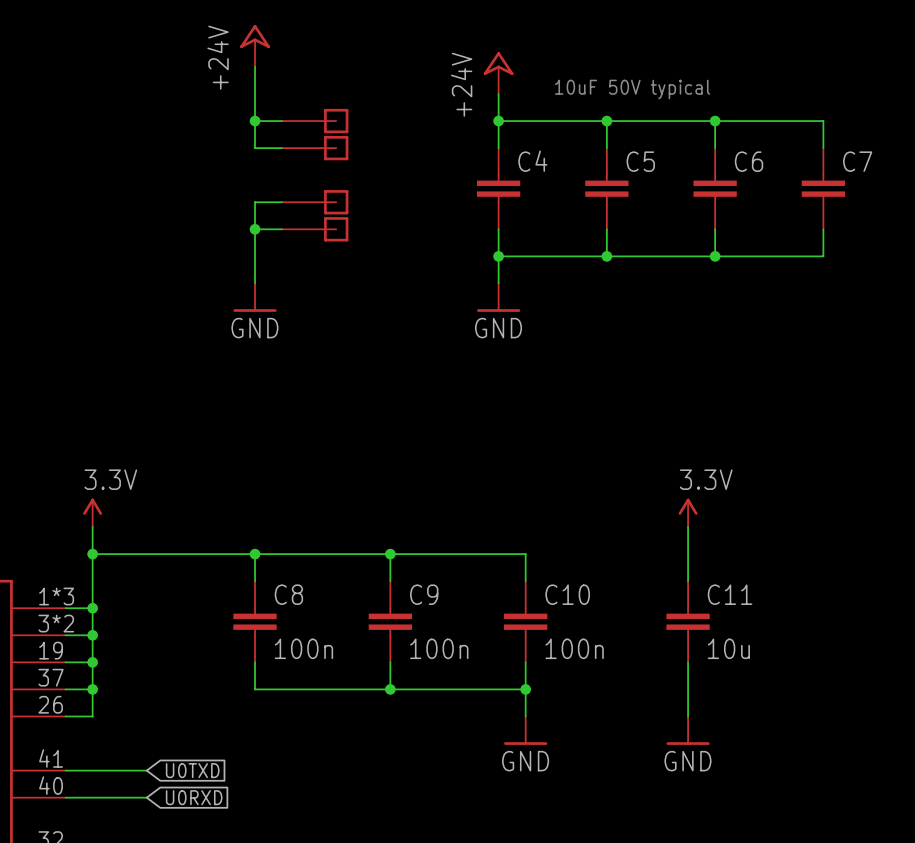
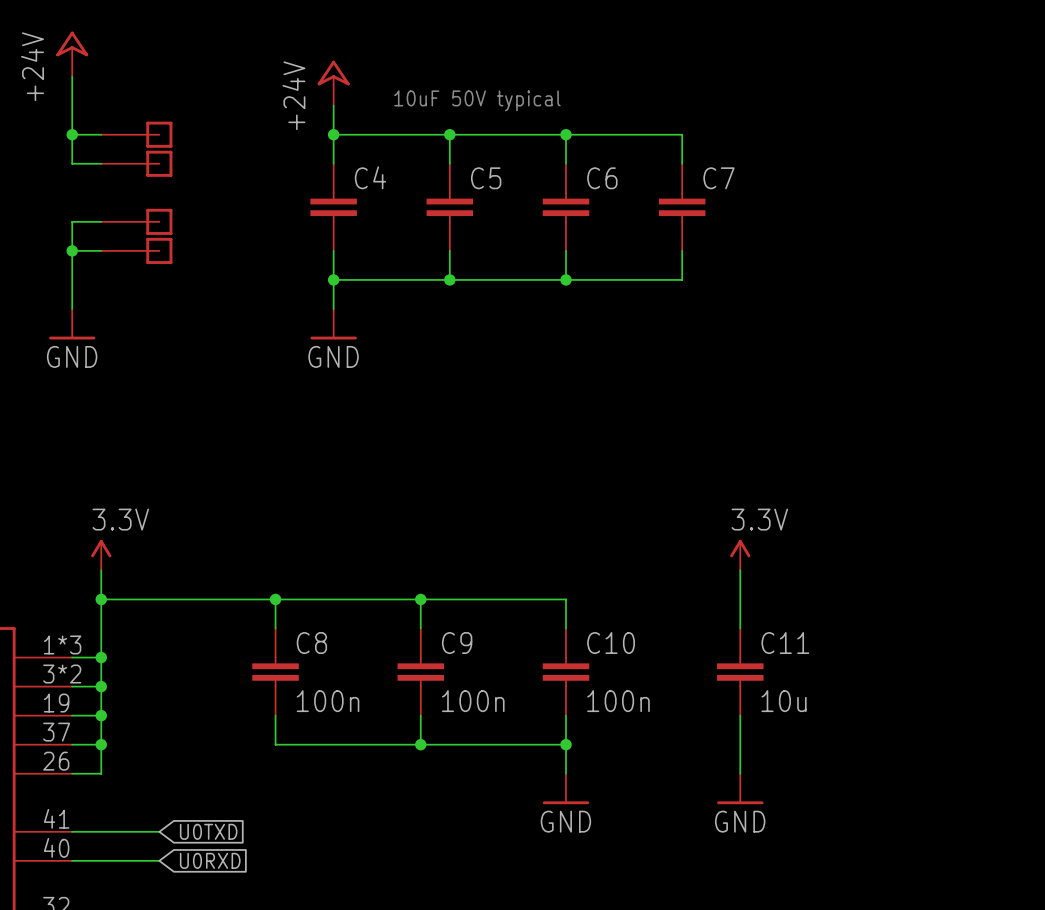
power symbol: none -> +24V (72, 54)
power symbol position: +24V (255, 45) -> +24V (333, 83)
wire: (255, 66) (255, 148) (282, 148) -> (72, 76) (72, 163) (101, 163)
power symbol: +24V (498, 73) -> none
text position: 10uF 50V typical (632, 89) -> 10uF 50V typical (477, 100)
wire: (498, 93) (498, 148) -> (333, 105) (333, 163)
junction: none -> (72, 134)
part: none -> (136, 134)
wire: (255, 121) (282, 121) -> (72, 134) (101, 134)
junction position: (255, 121) -> (333, 134)
wire: none -> (333, 134) (536, 134)
part: (315, 121) -> none
junction: none -> (449, 134)
junction position: (498, 121) -> (566, 134)
wire: (606, 121) (606, 148) -> (449, 134) (449, 163)
junction: (606, 121) -> none
wire: (633, 121) (823, 121) (823, 148) -> (682, 134) (682, 163)
wire: (715, 121) (715, 148) -> (566, 134) (566, 163)
junction: (715, 121) -> none
part: none -> (136, 163)
part: (315, 148) -> none
C4 position: (498, 188) -> (333, 207)
C5 position: (606, 188) -> (449, 207)
C6 position: (715, 188) -> (566, 207)
C7 position: (823, 188) -> (682, 207)
part: none -> (136, 221)
wire: (282, 202) (255, 202) (255, 283) -> (101, 221) (72, 221) (72, 309)
part: (315, 202) -> none
junction: none -> (72, 250)
part: none -> (136, 250)
wire: (255, 229) (282, 229) -> (72, 250) (101, 250)
junction: (255, 229) -> none
part: (315, 229) -> none
wire: (498, 229) (498, 283) -> (333, 250) (333, 309)
wire: (606, 229) (606, 256) -> (449, 250) (449, 279)
wire: (715, 229) (715, 256) -> (566, 250) (566, 279)
wire: (823, 229) (823, 256) (633, 256) -> (682, 250) (682, 279)
wire: none -> (333, 279) (536, 279)
junction: none -> (333, 279)
junction: none -> (449, 279)
junction position: (498, 256) -> (566, 279)
junction: (606, 256) -> none
junction: (715, 256) -> none
power symbol: none -> GND (72, 324)
power symbol position: GND (255, 297) -> GND (333, 324)
power symbol: GND (498, 297) -> none

